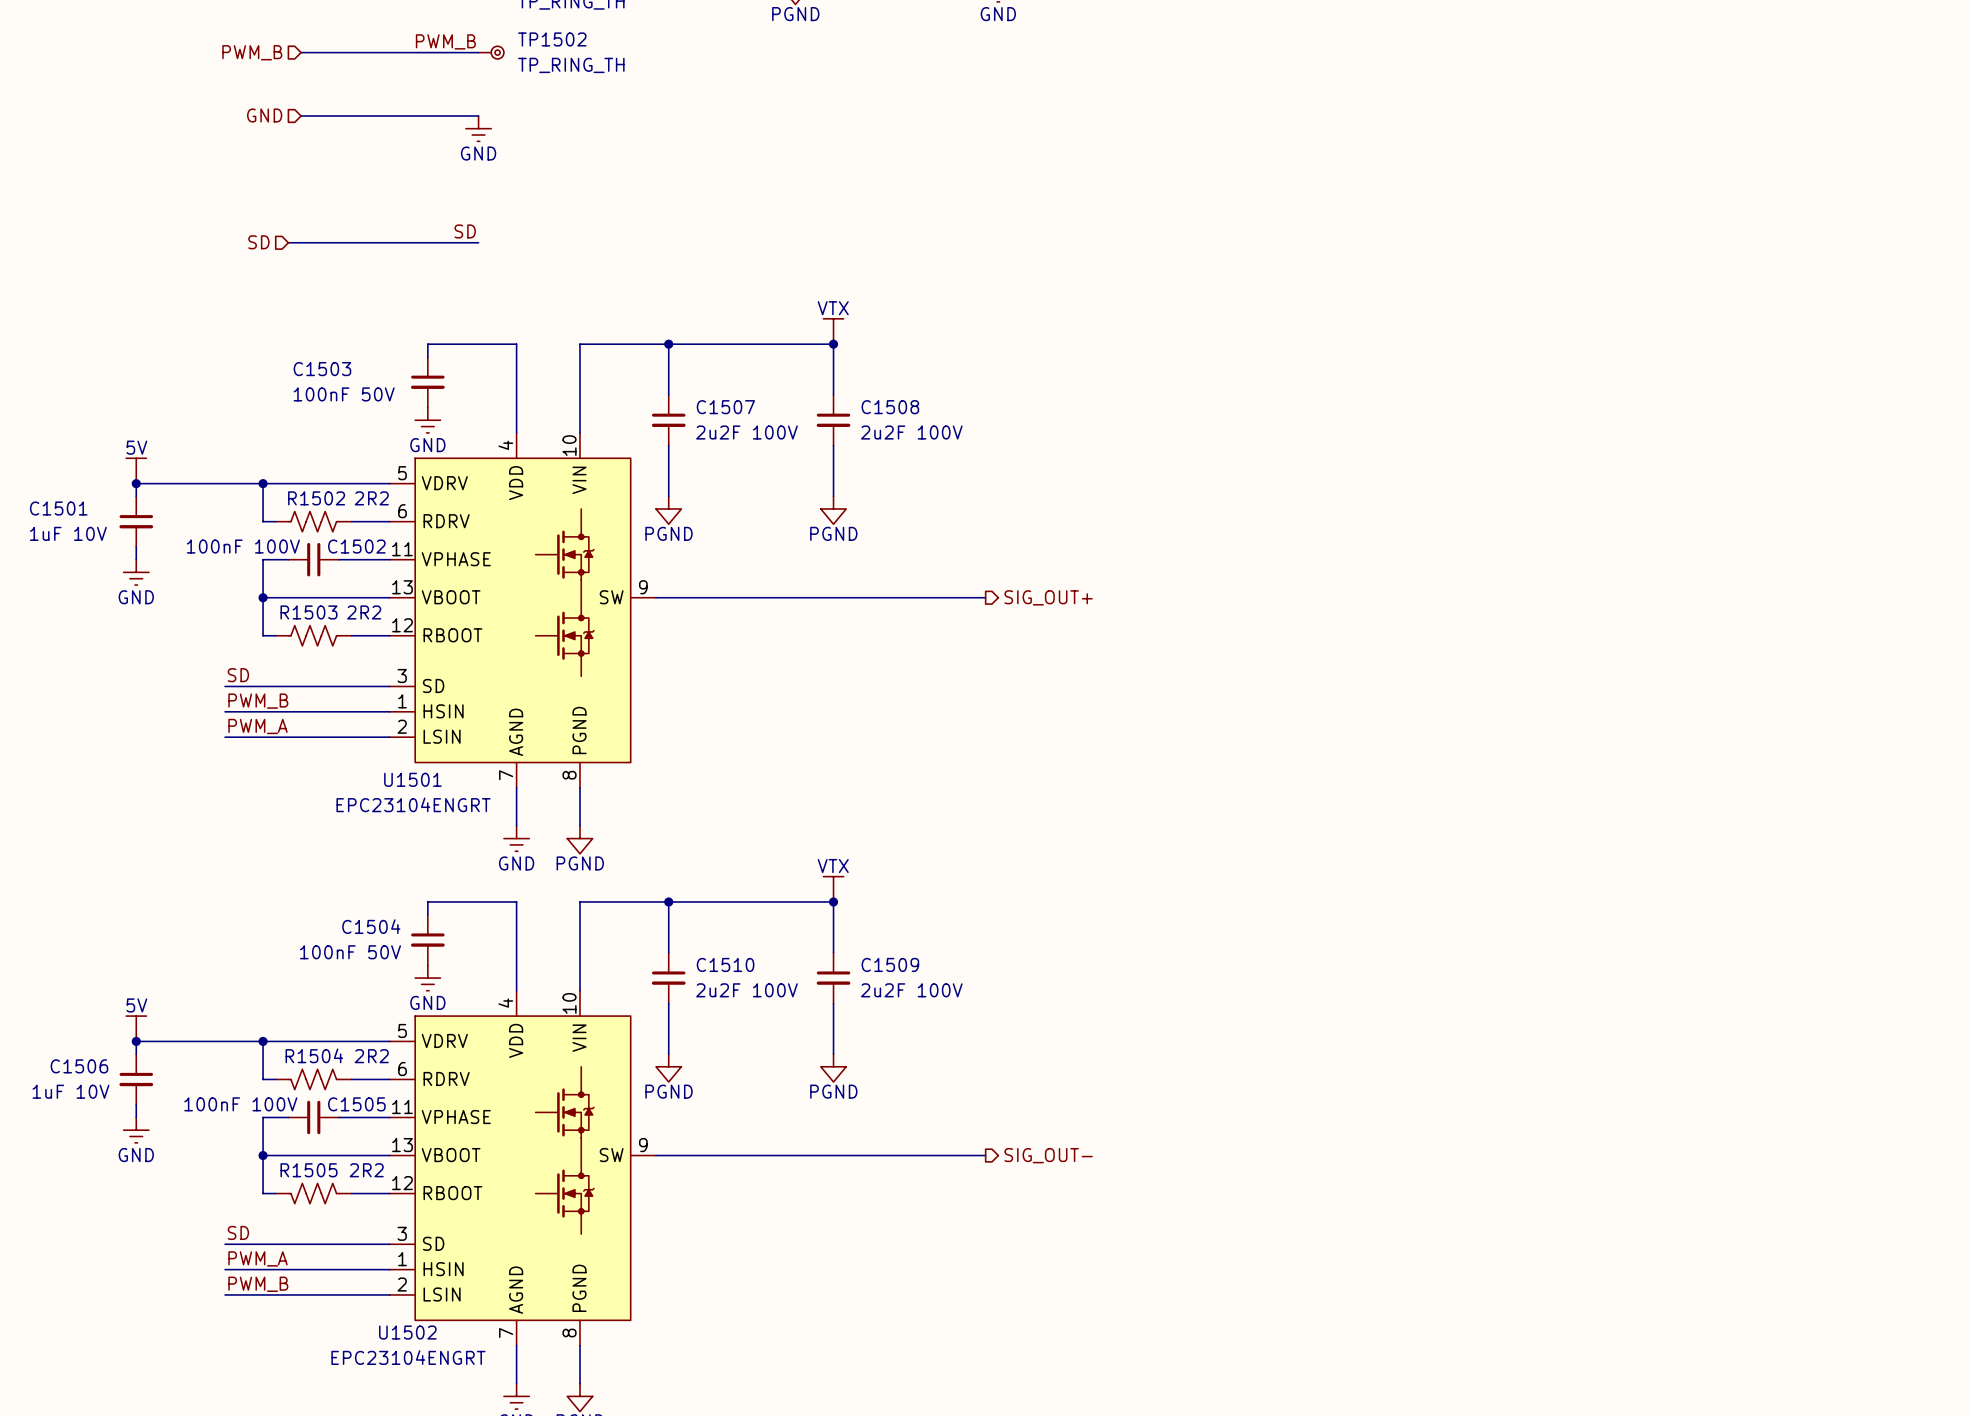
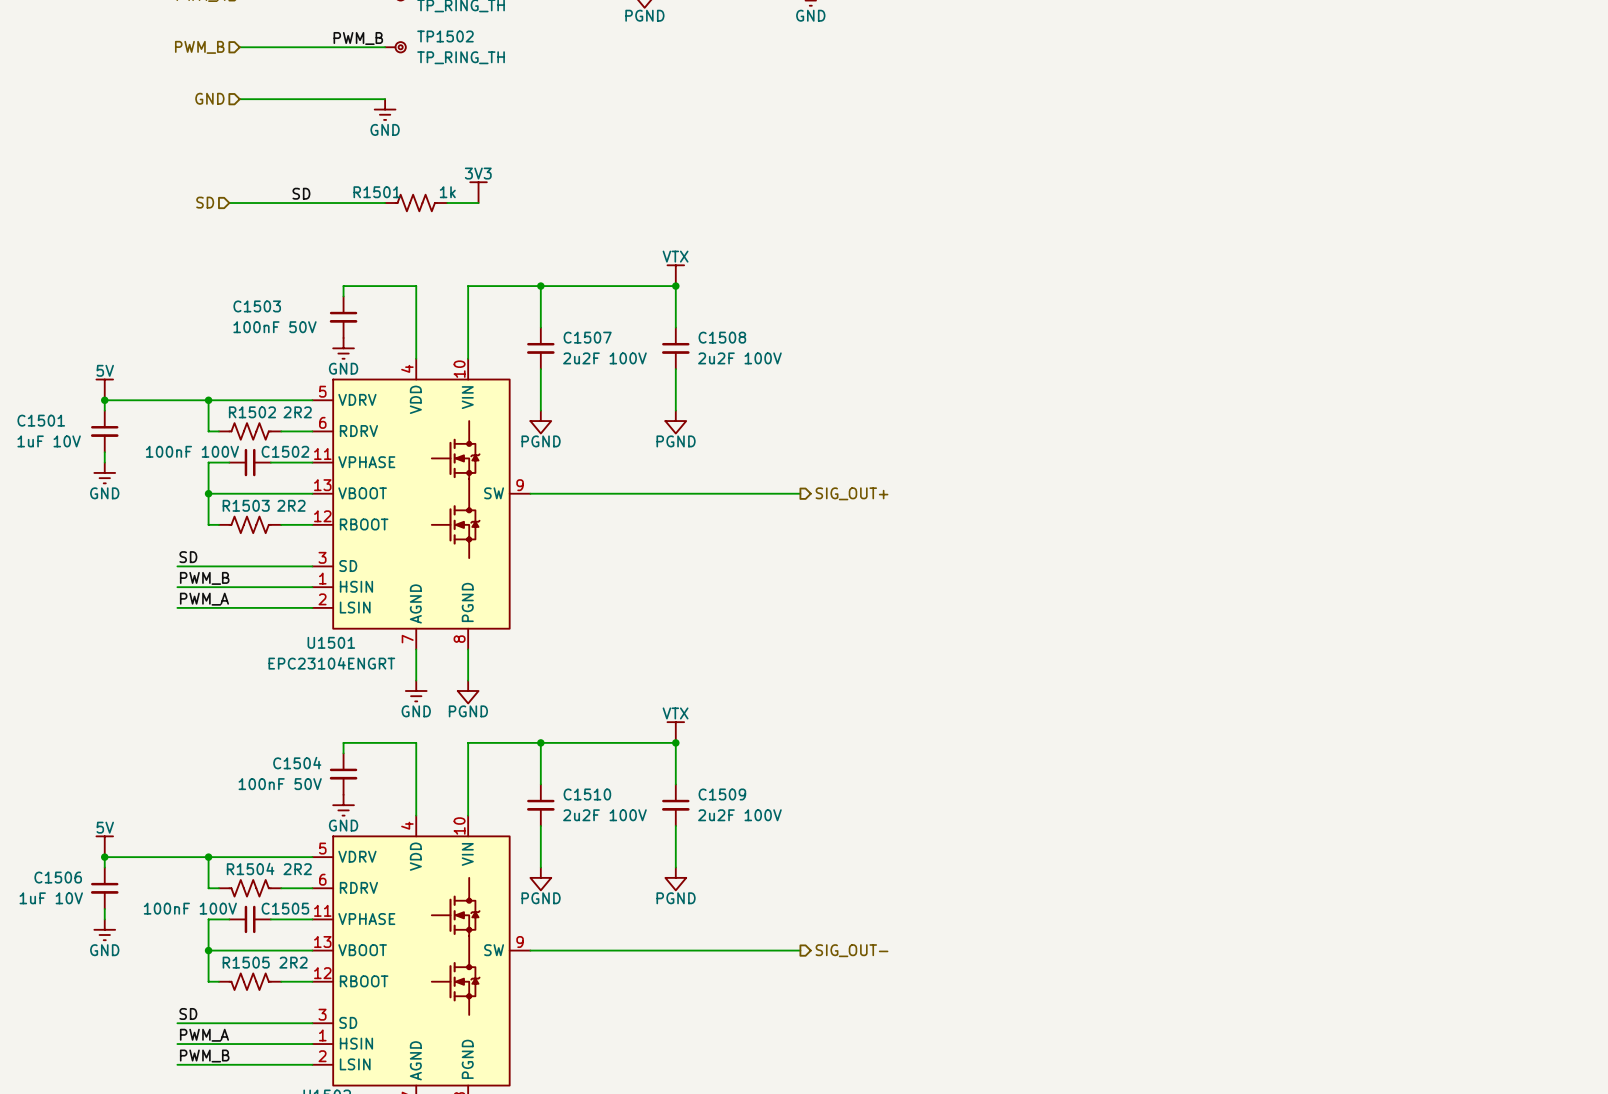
power symbol: none -> 3V3 (478, 192)
label position: SD (465, 231) -> SD (301, 193)
R1501: none -> 1k (416, 203)
wire: none -> (447, 203) (478, 203)

